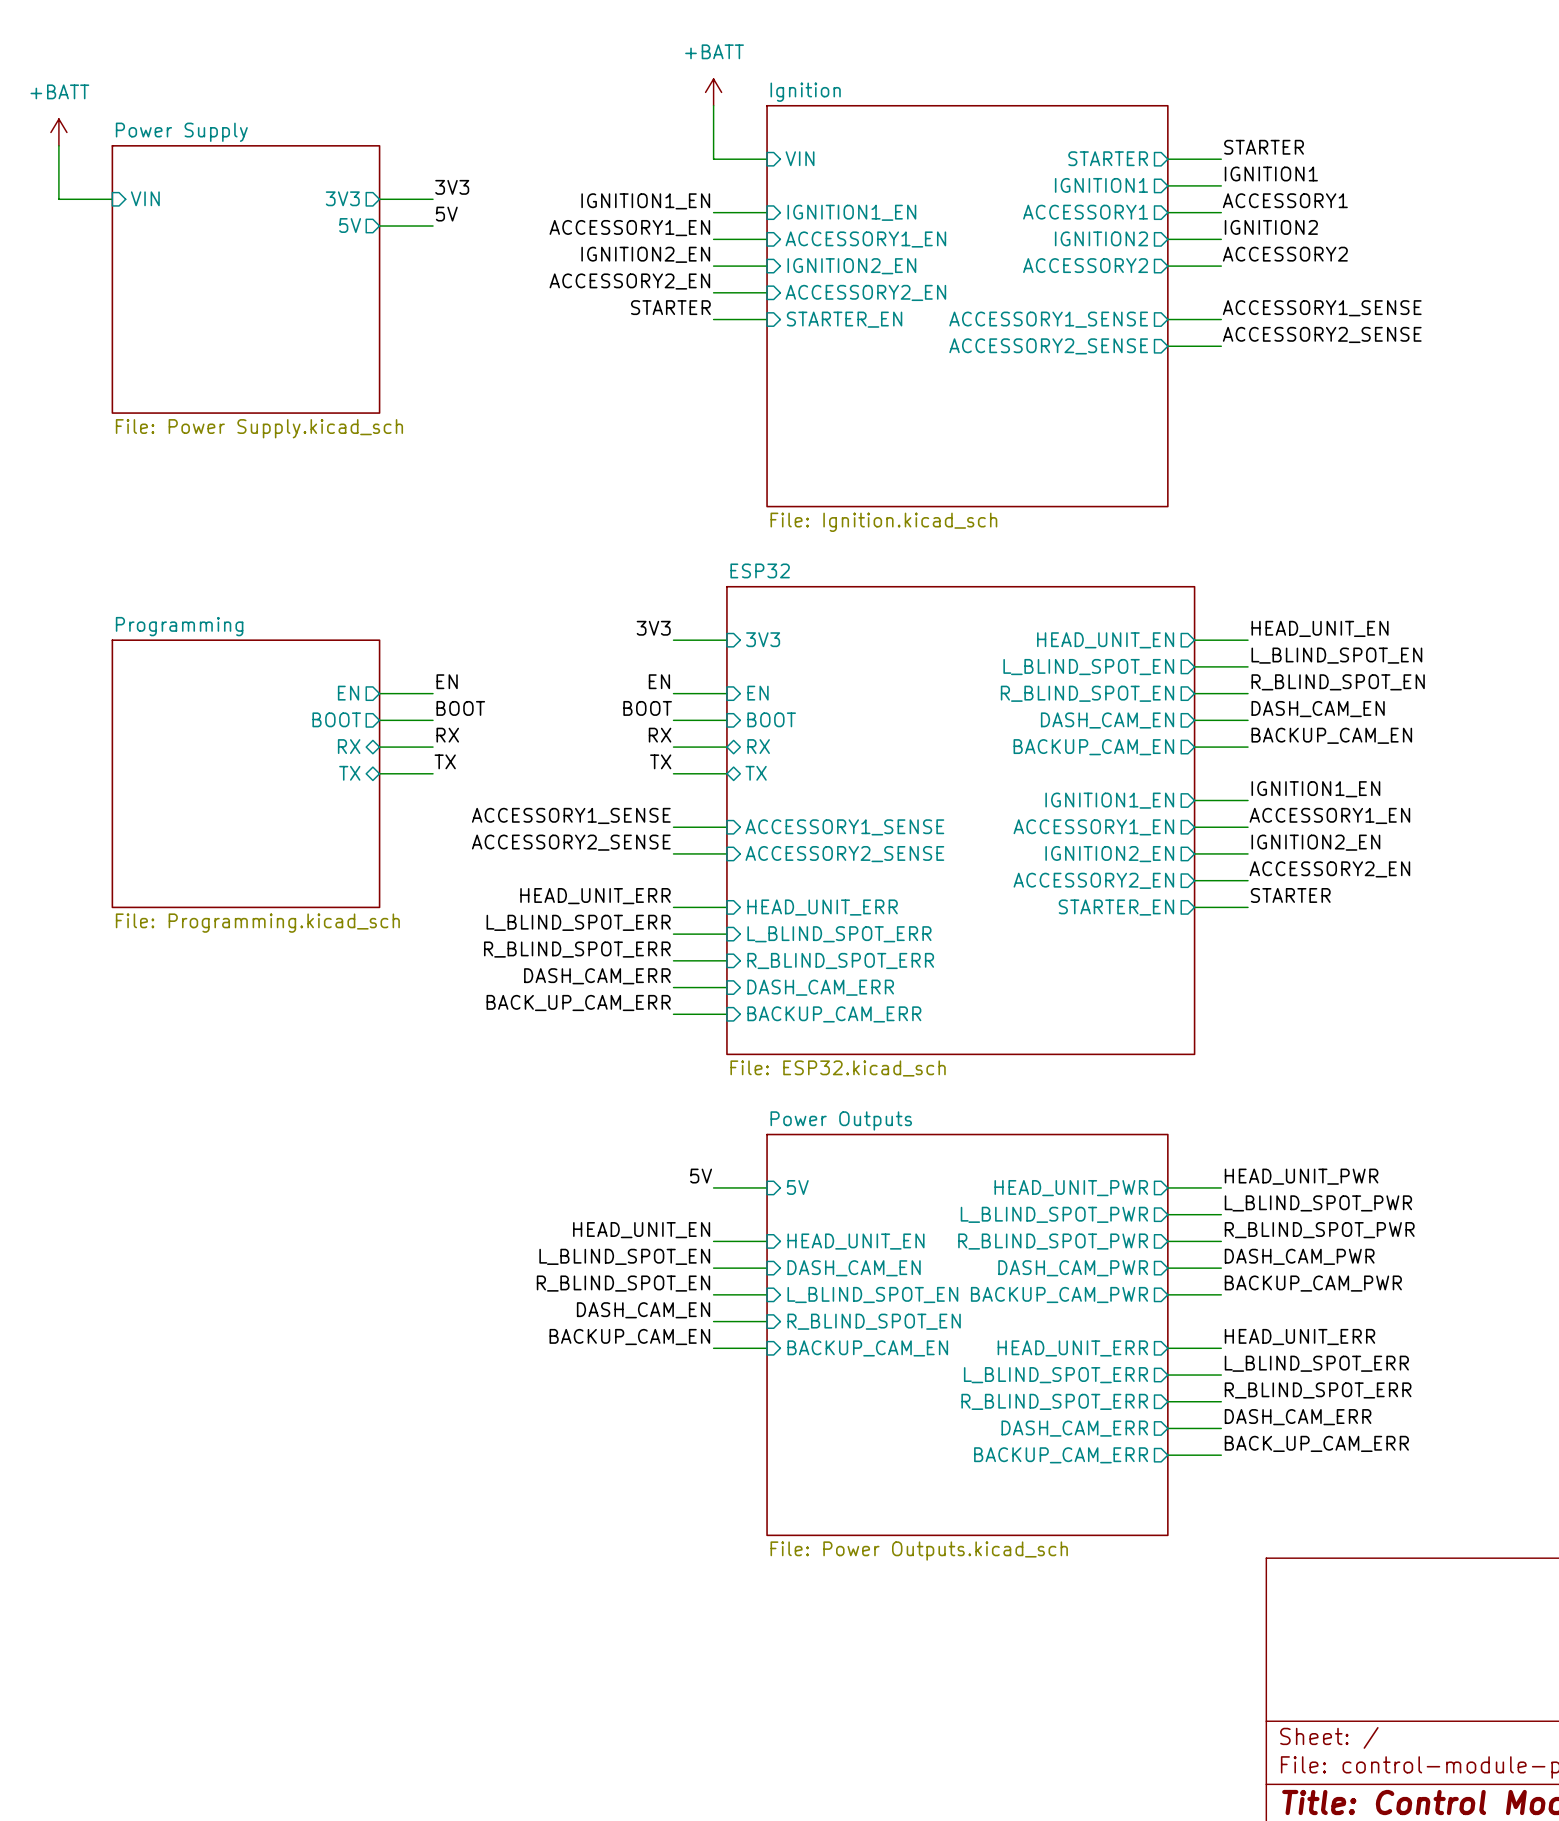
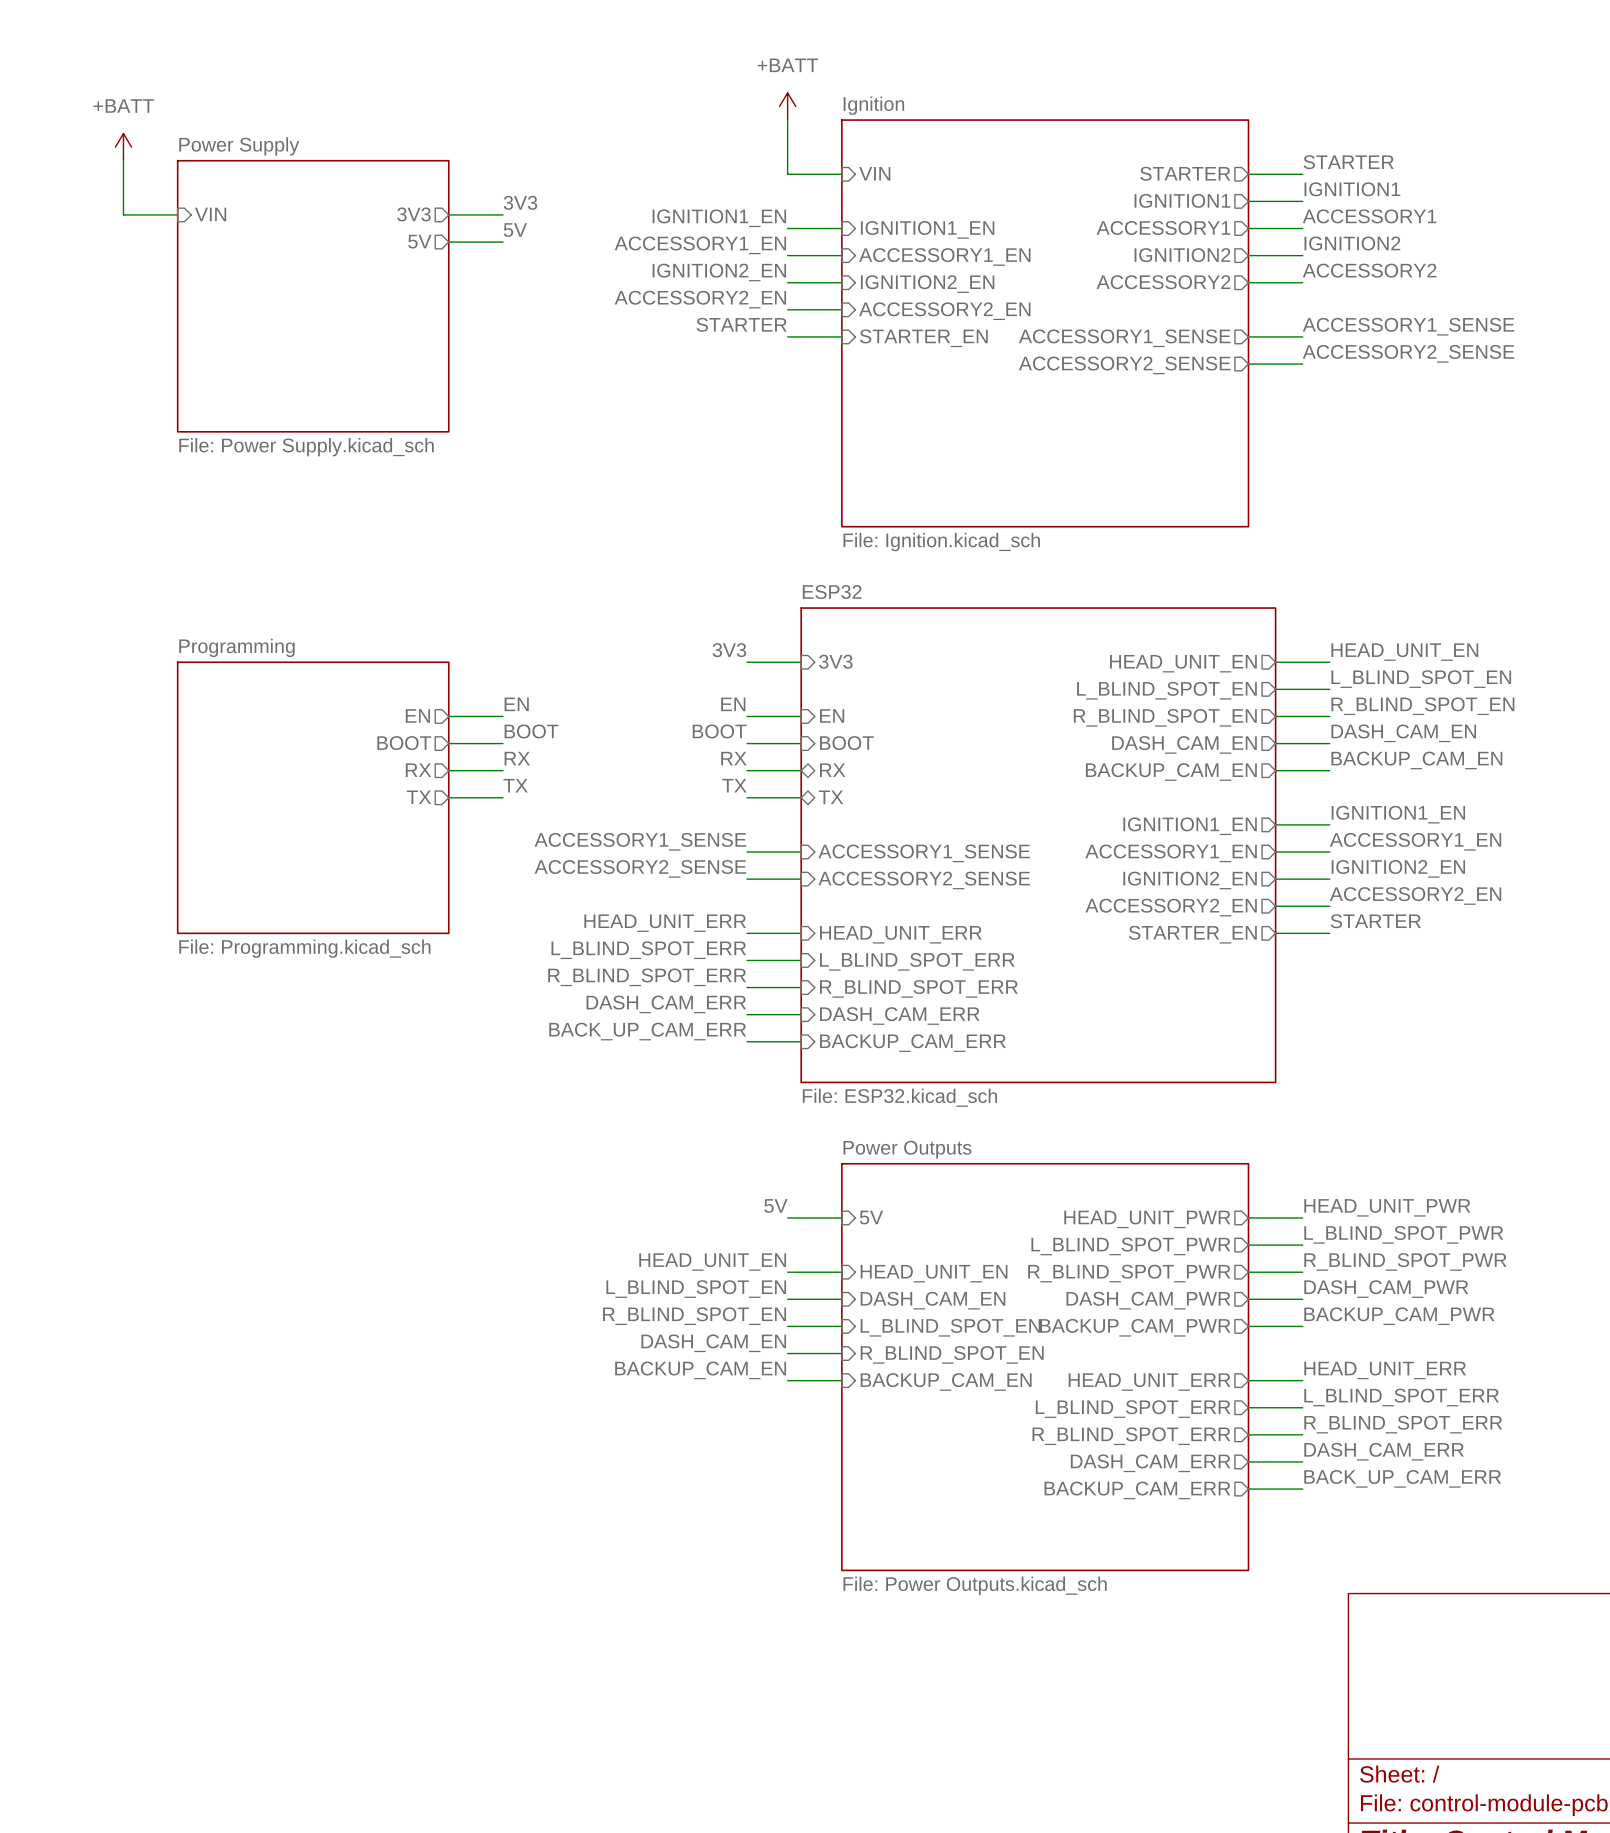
sheet pin shape: bidirectional (349, 746) -> output (418, 770)
sheet pin shape: bidirectional (349, 773) -> output (418, 797)

